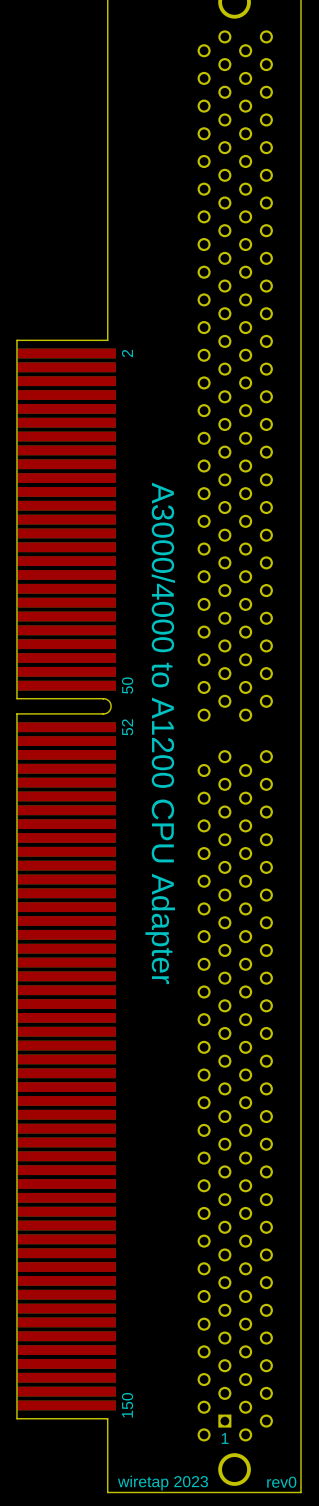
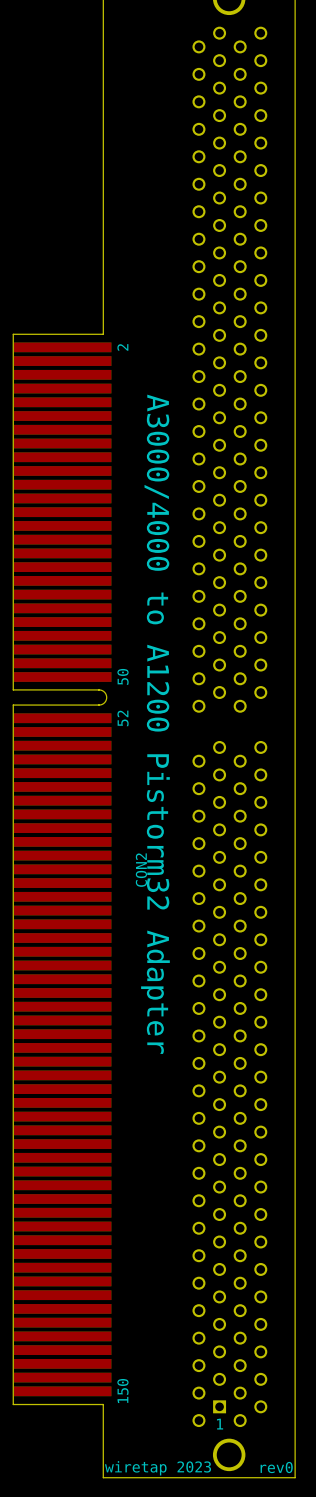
text: A3000/4000 to A1200 CPU Adapter (160, 733) -> A3000/4000 to A1200 Pistorm32 Adapter (155, 724)
CON2 name: none -> CON2 (141, 870)

